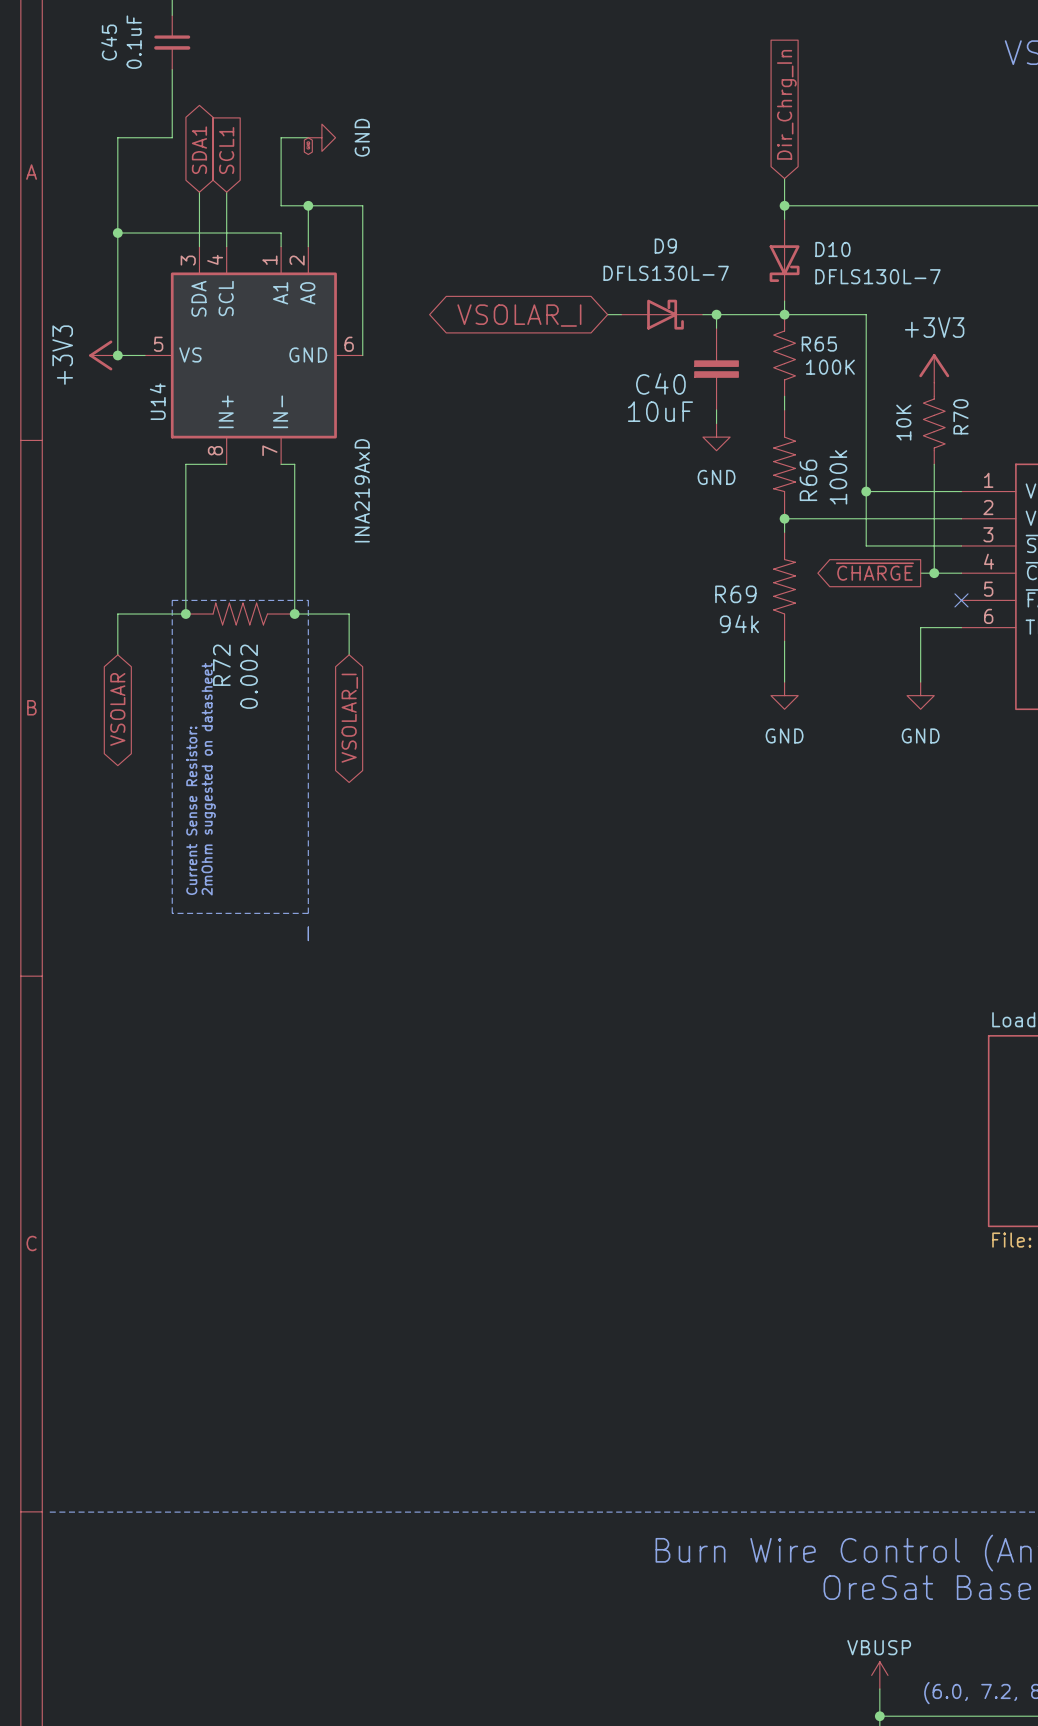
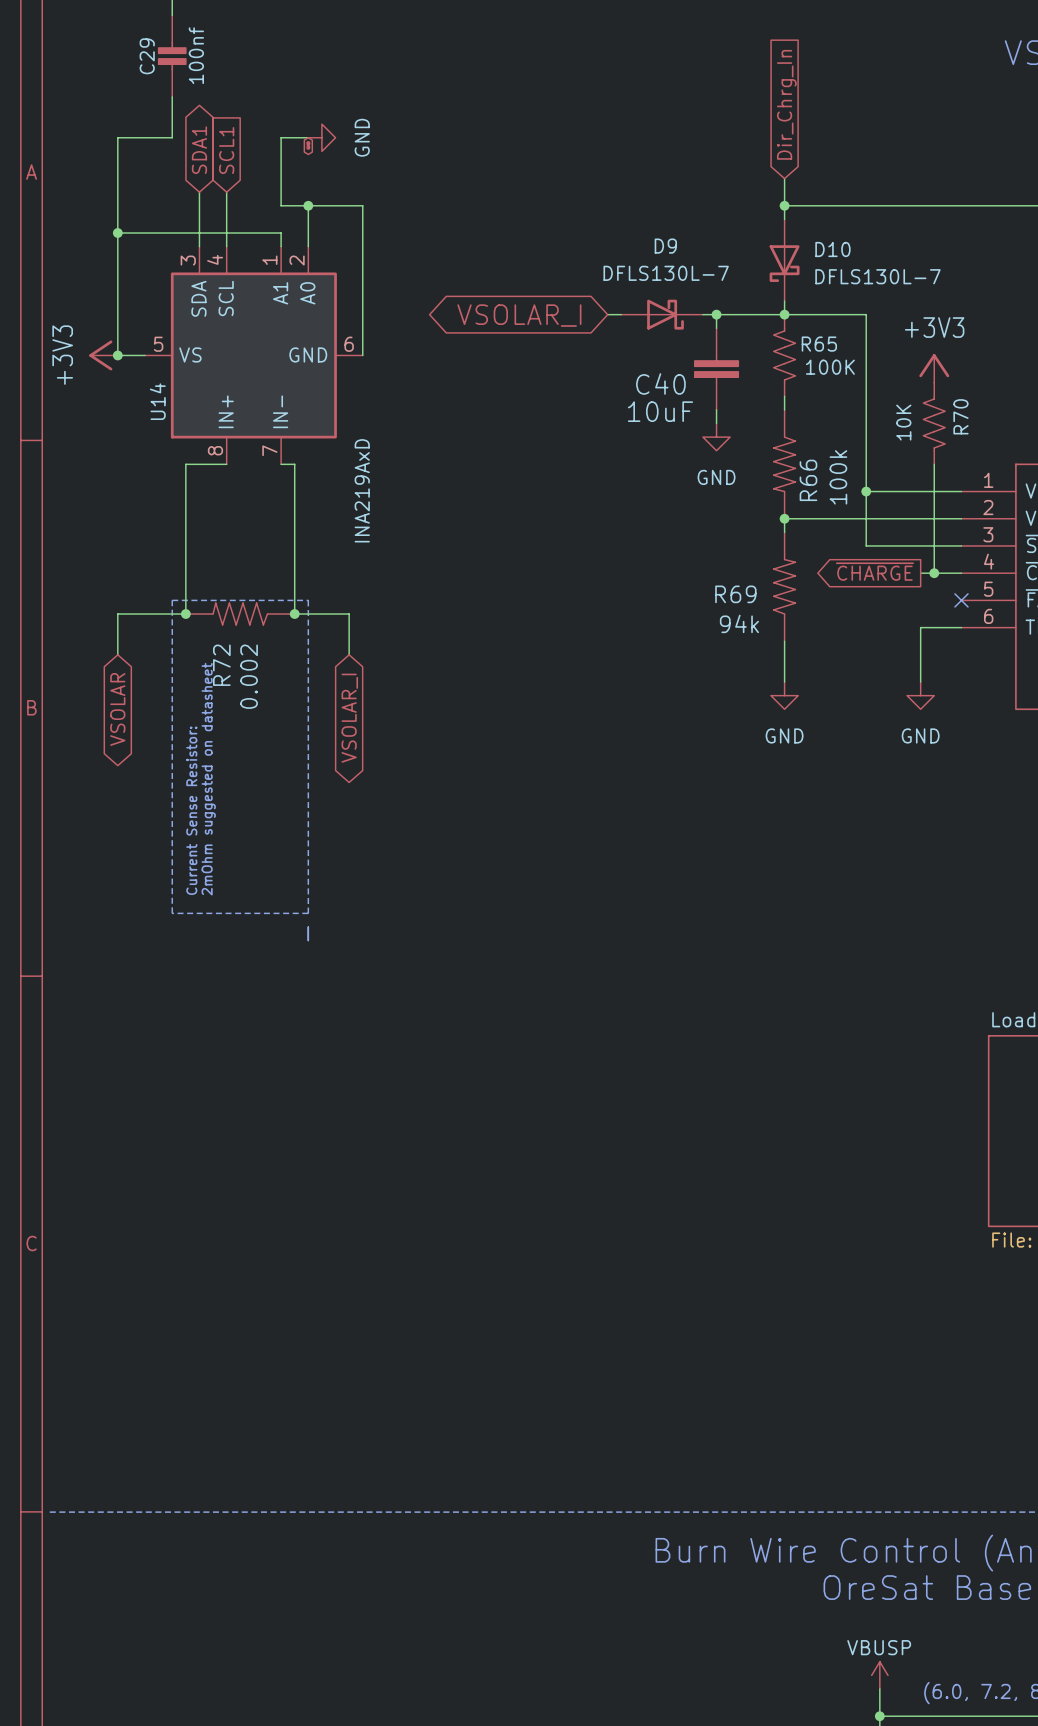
C45: 0.1uF (172, 42) -> none
C29: none -> 100nf (172, 56)

